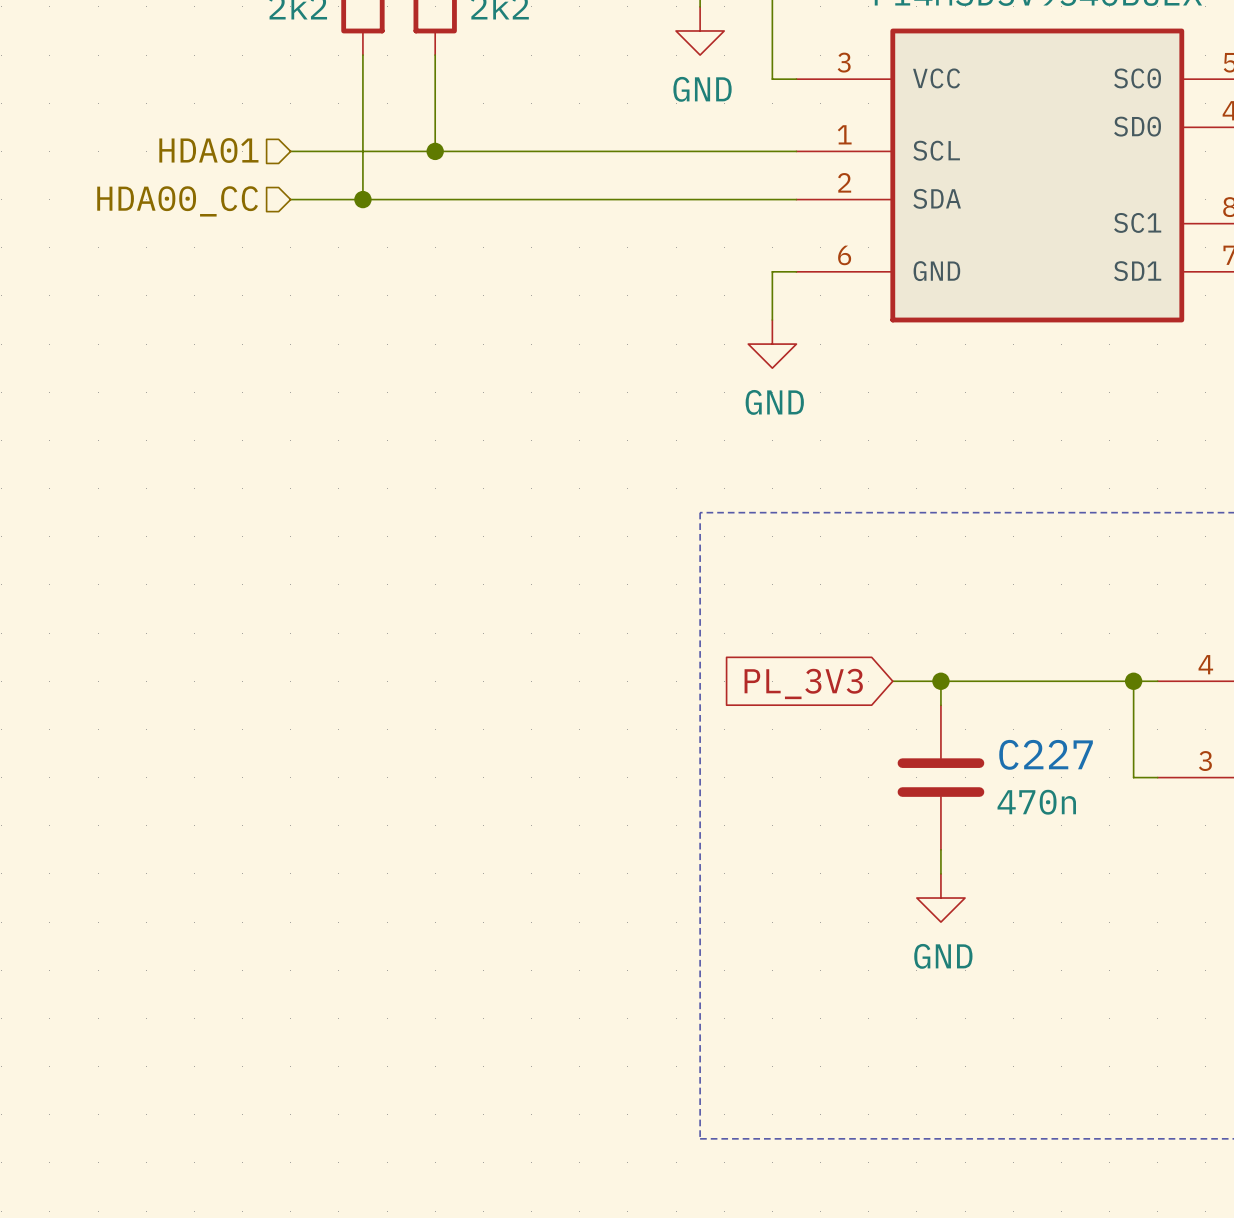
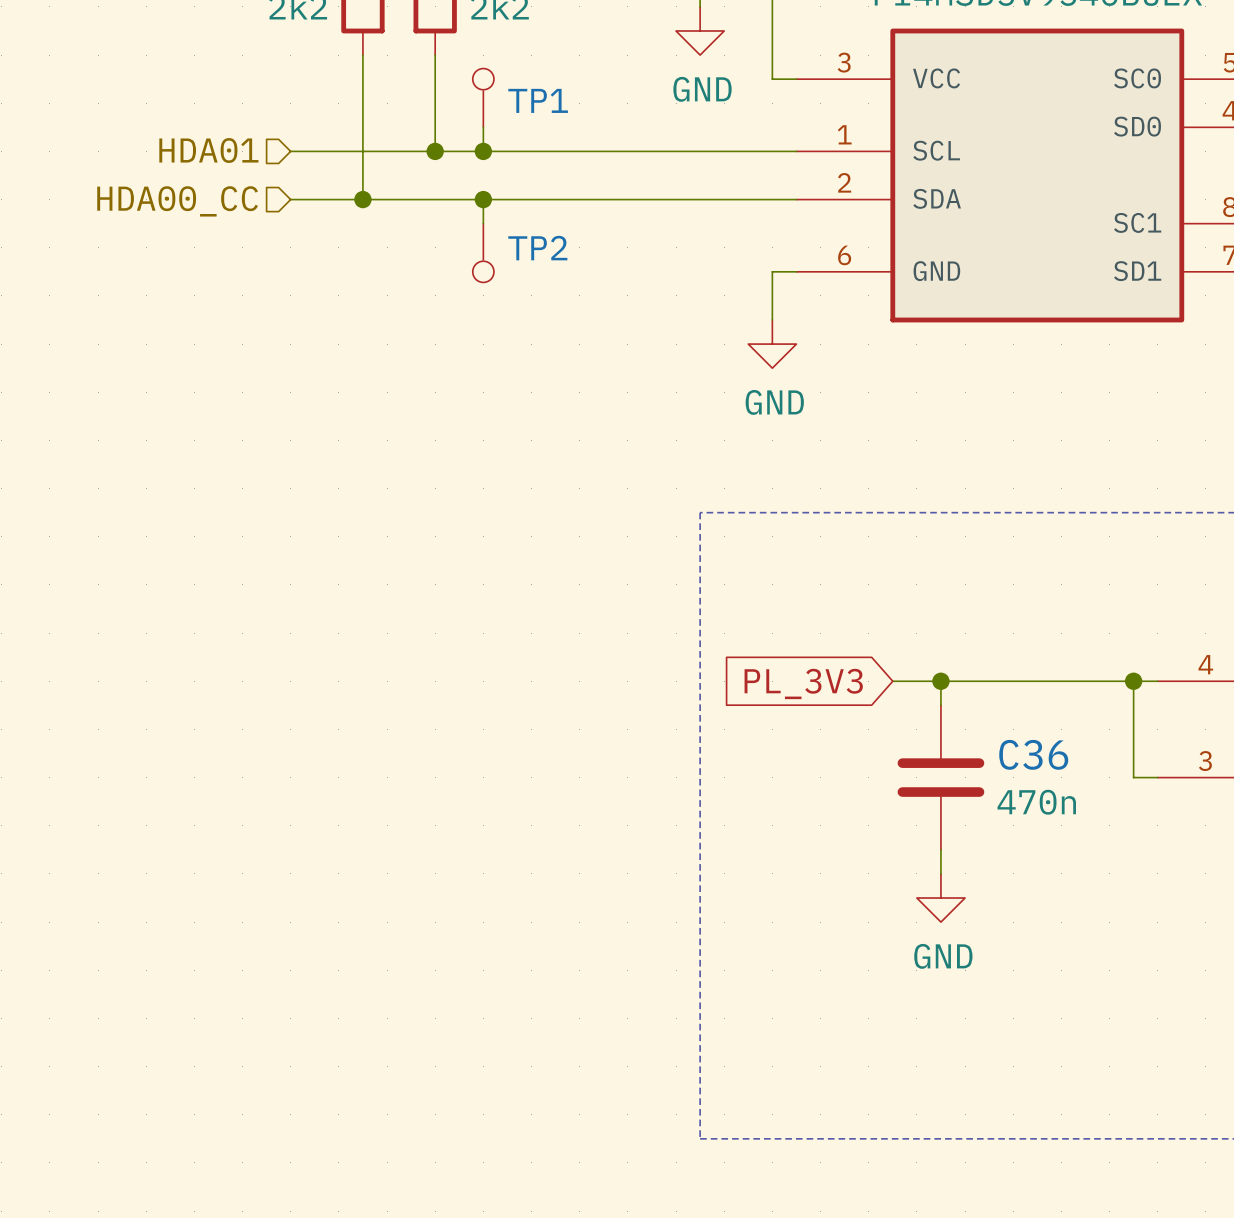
TP1: none -> (483, 97)
wire: none -> (483, 127) (483, 151)
junction: none -> (483, 151)
wire: none -> (483, 199) (483, 223)
junction: none -> (483, 199)
TP2: none -> (483, 253)
C227 name: C227 (1046, 754) -> C36 (1033, 754)

